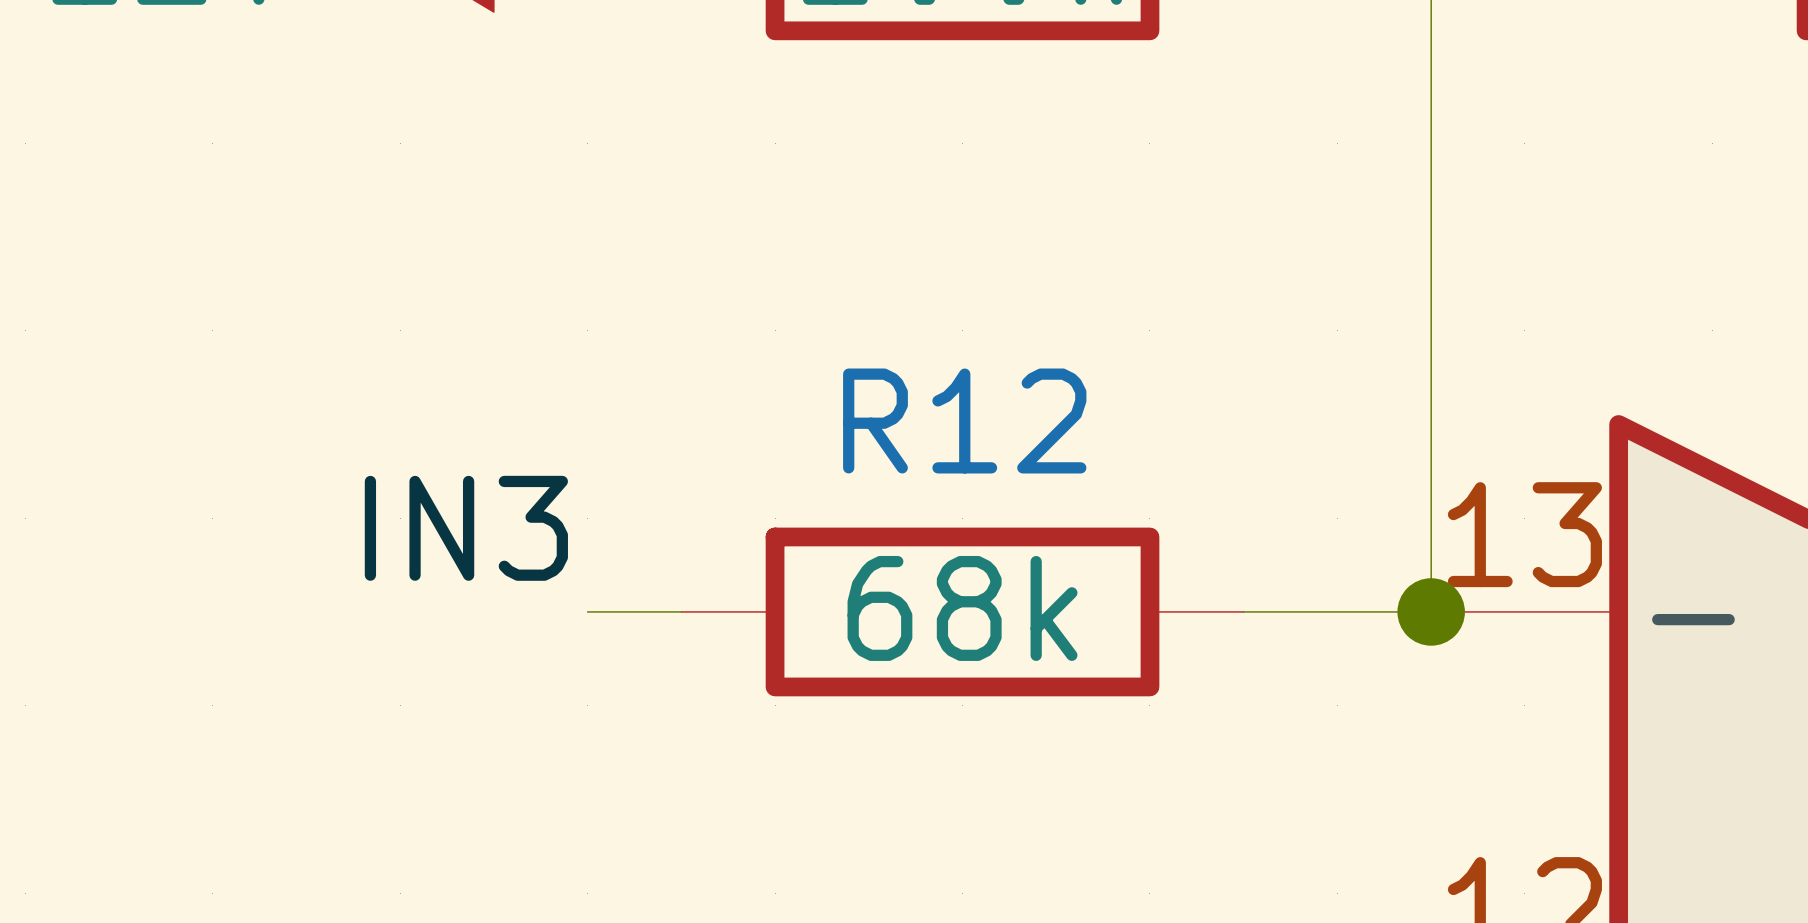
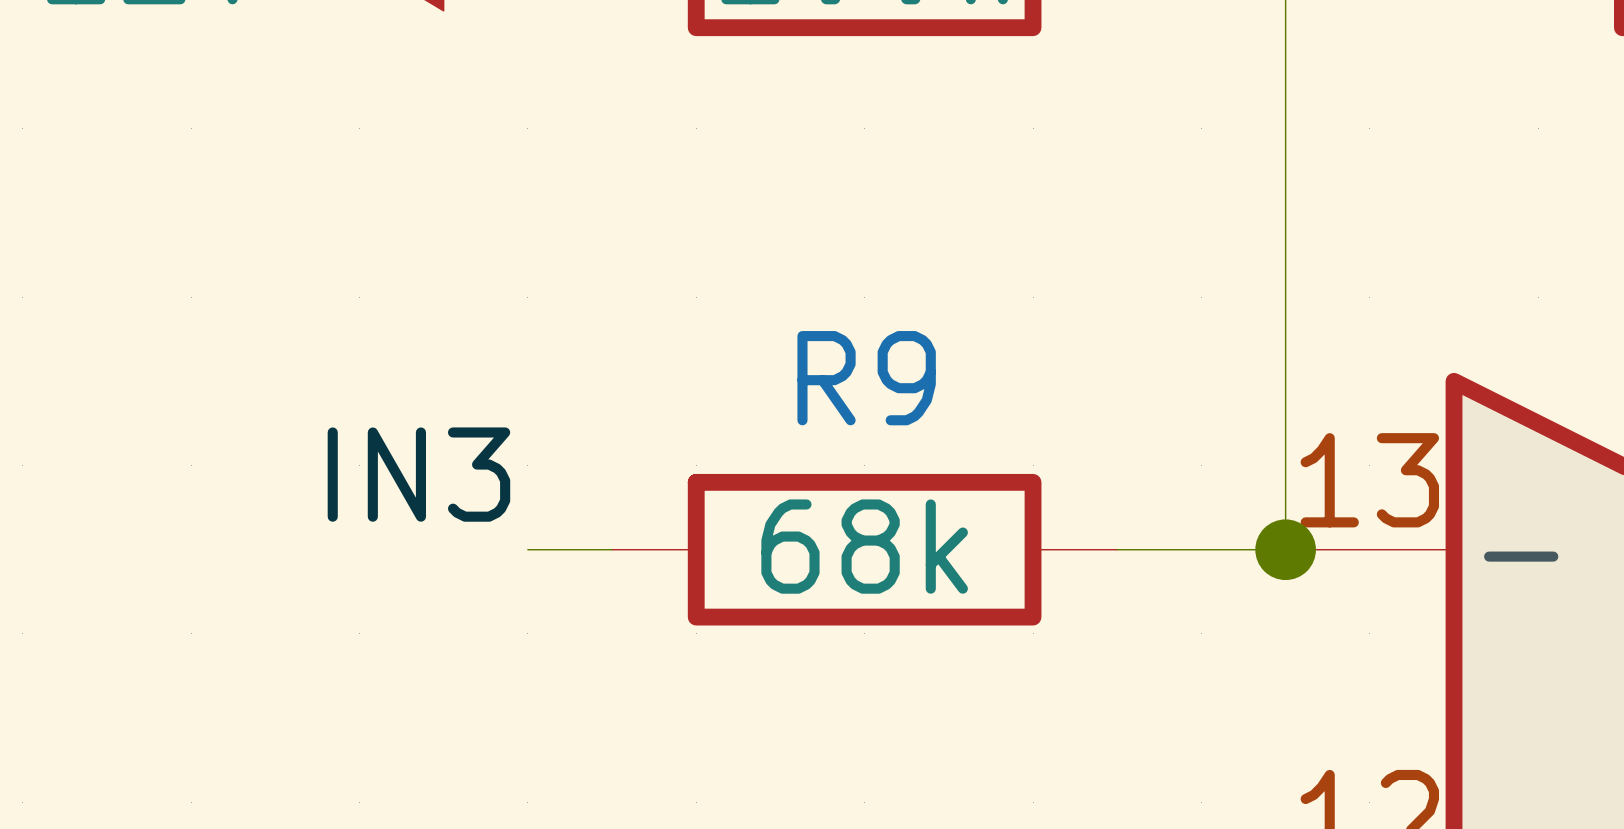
R12 name: R12 (964, 420) -> R9 (866, 378)

